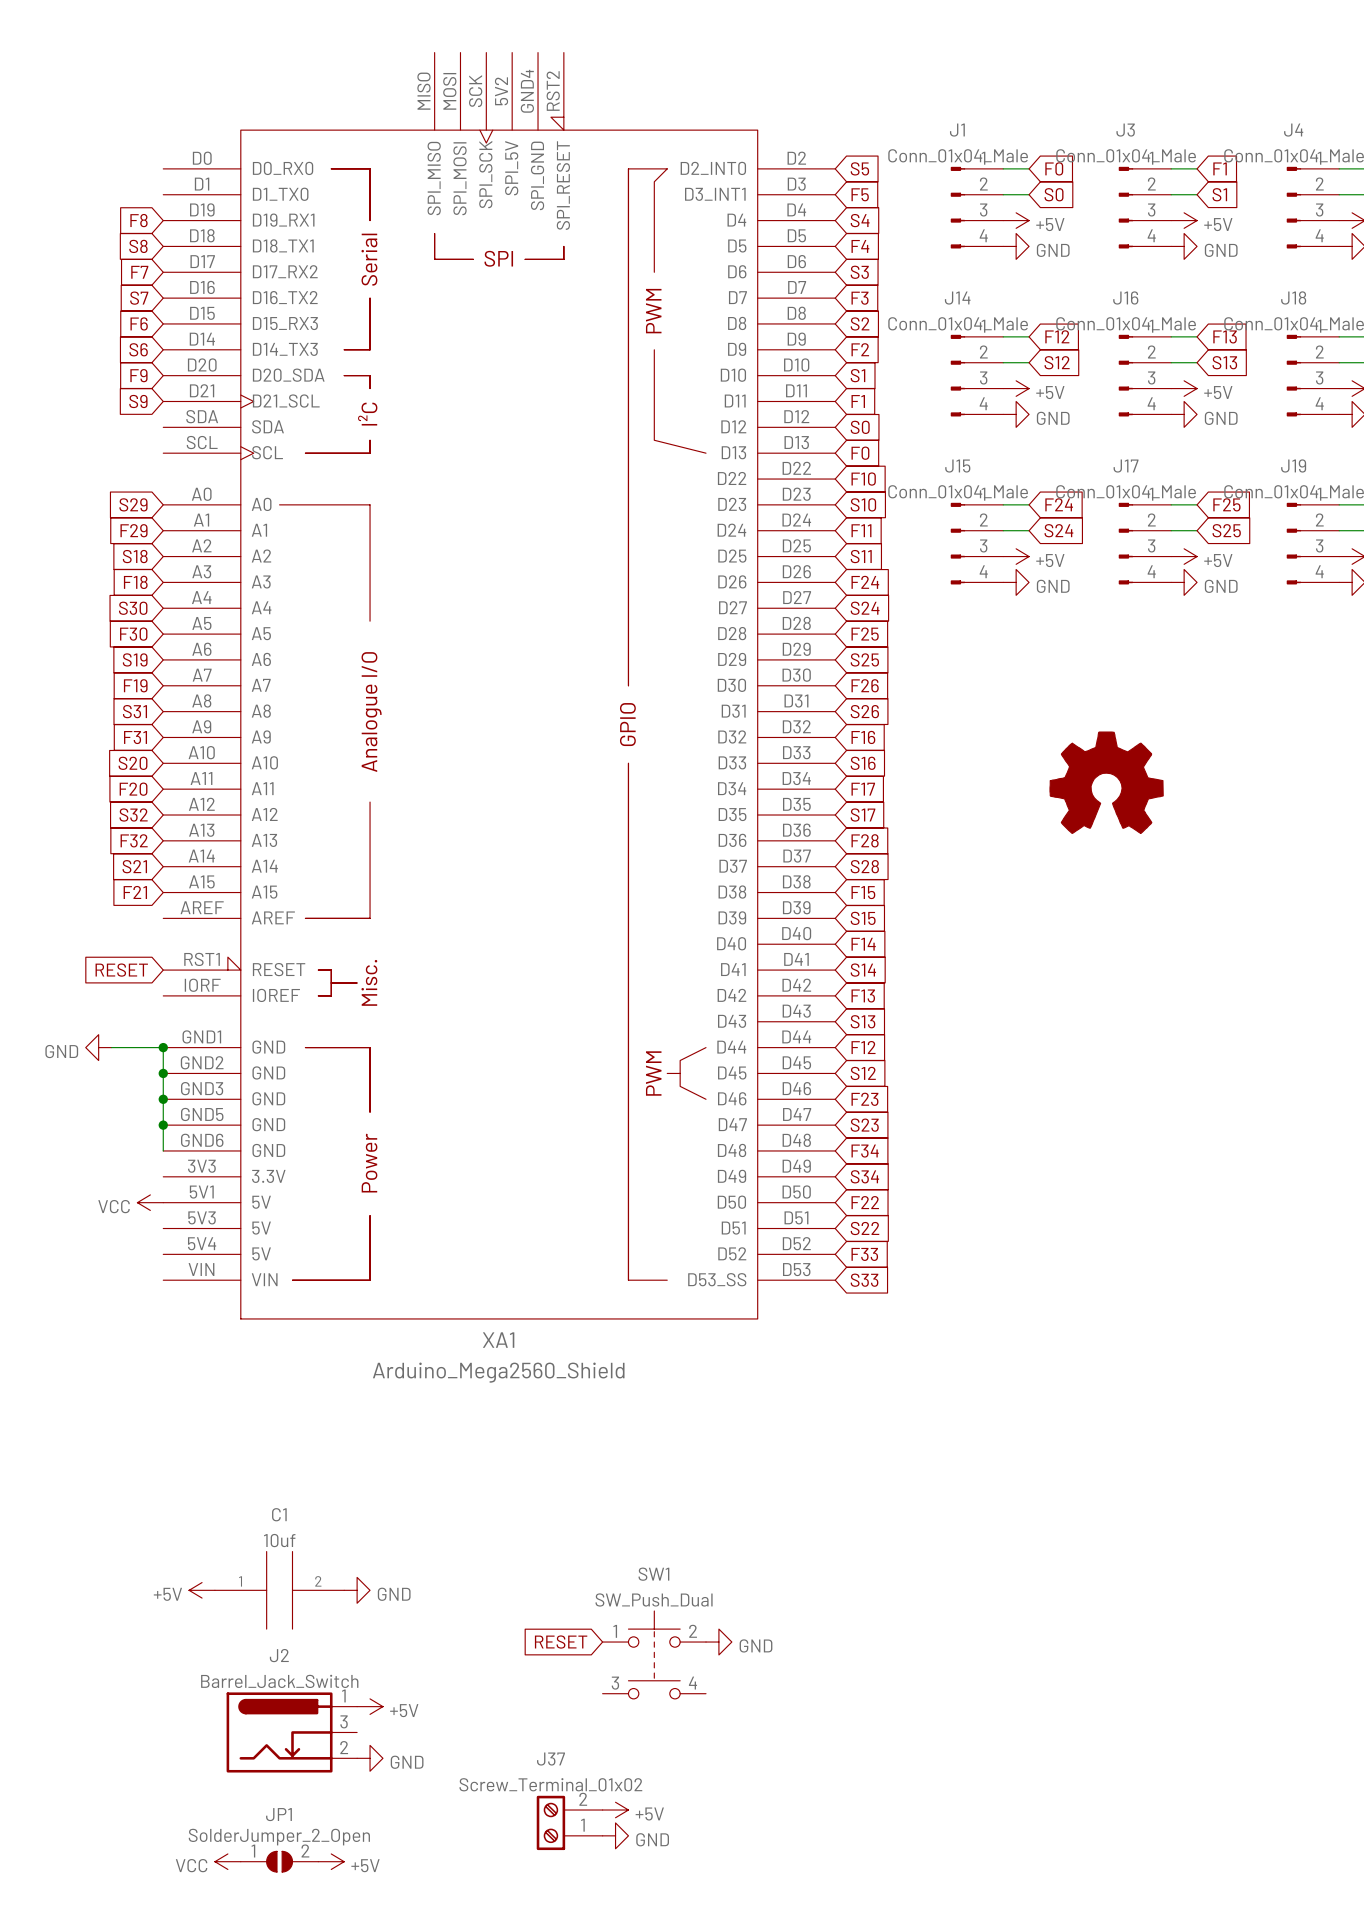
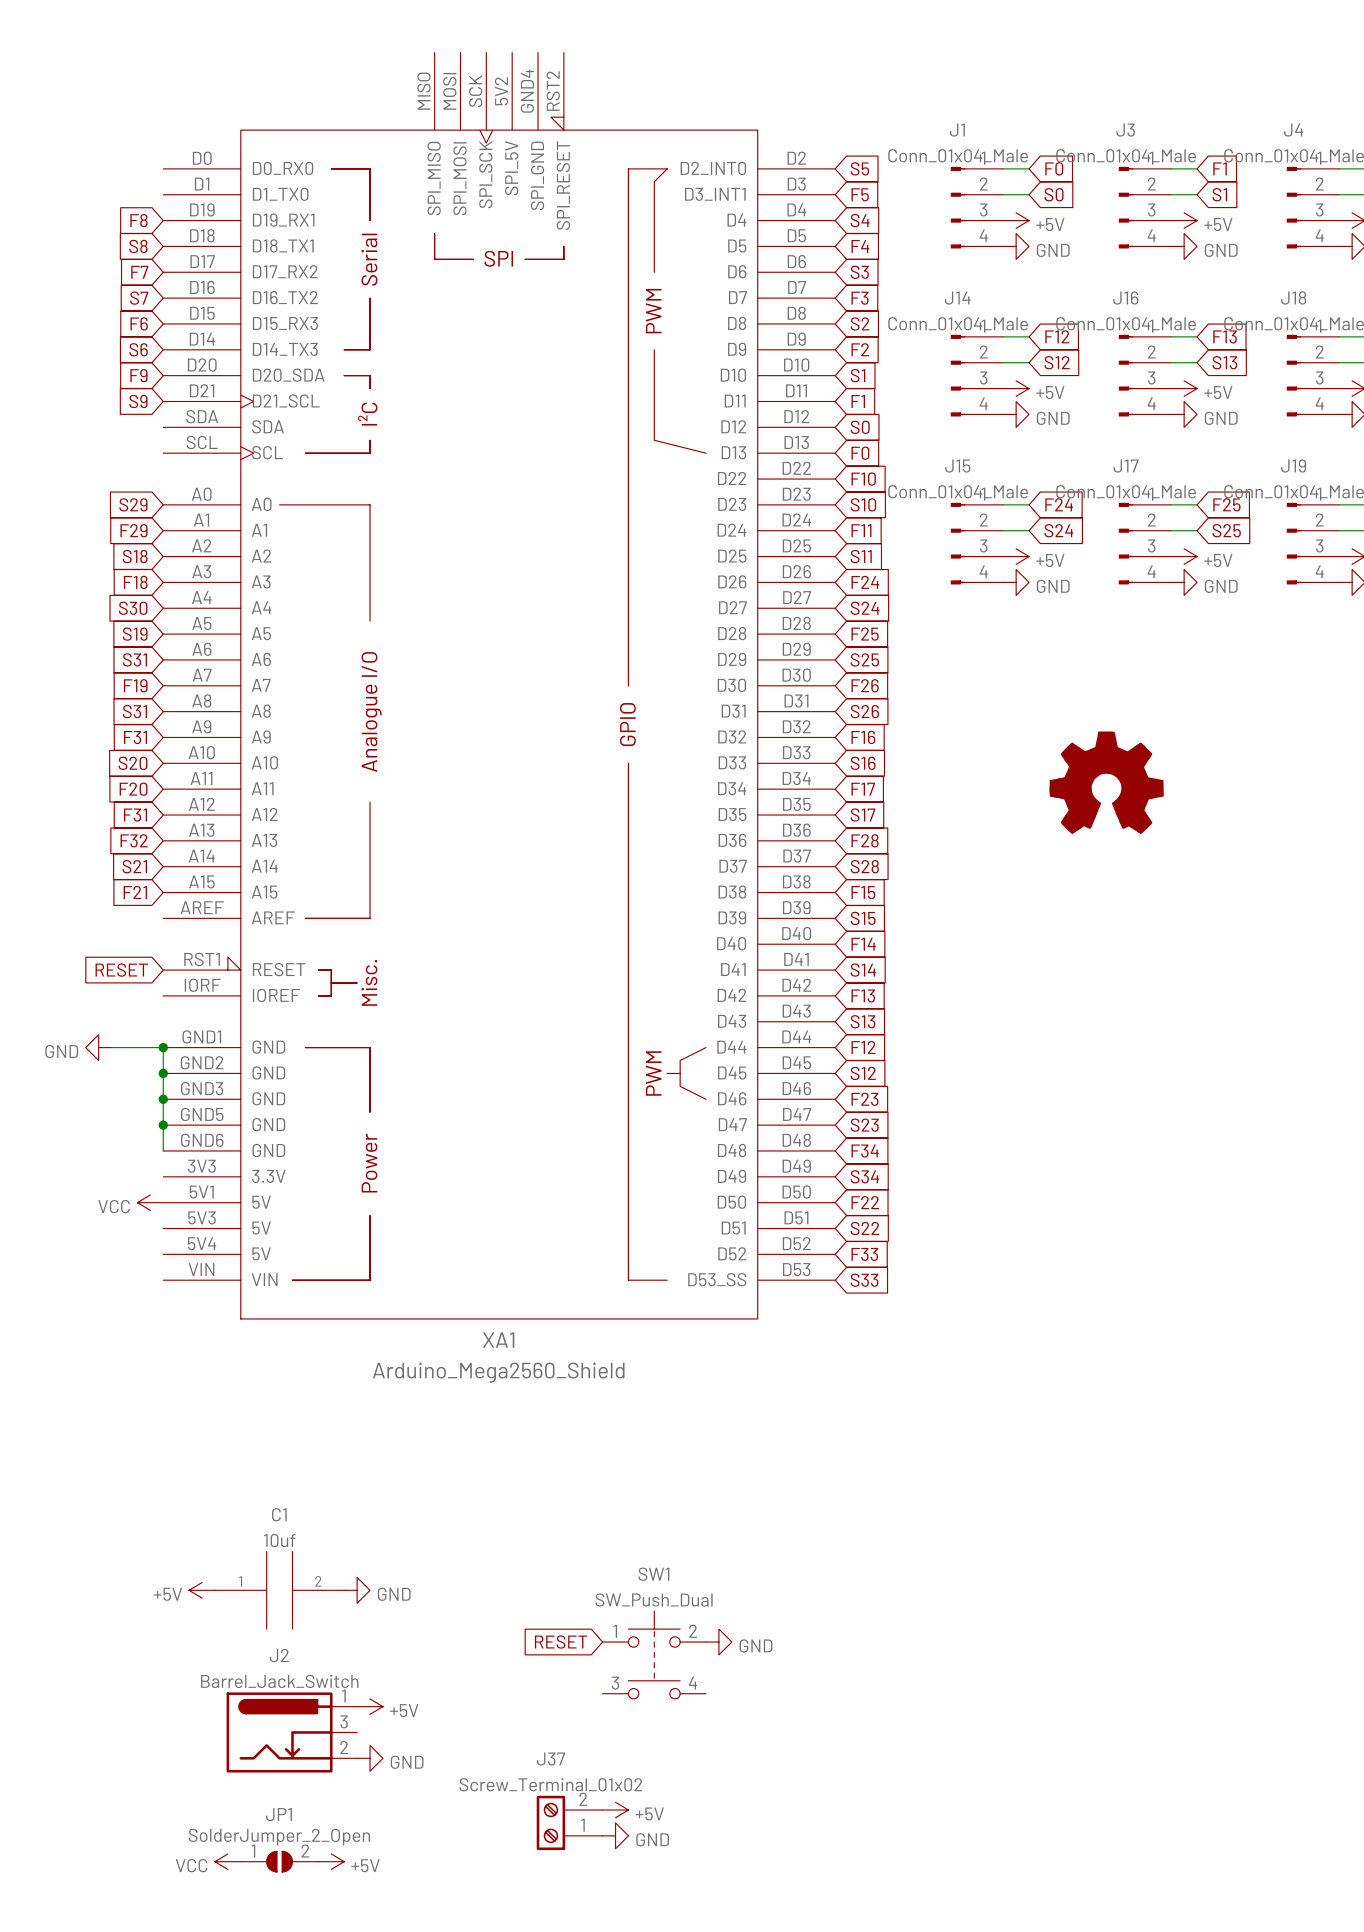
global label: F30 (133, 634) -> S19 (135, 634)
global label: S19 (135, 659) -> S31 (134, 659)
global label: S32 (133, 815) -> F31 (135, 815)

